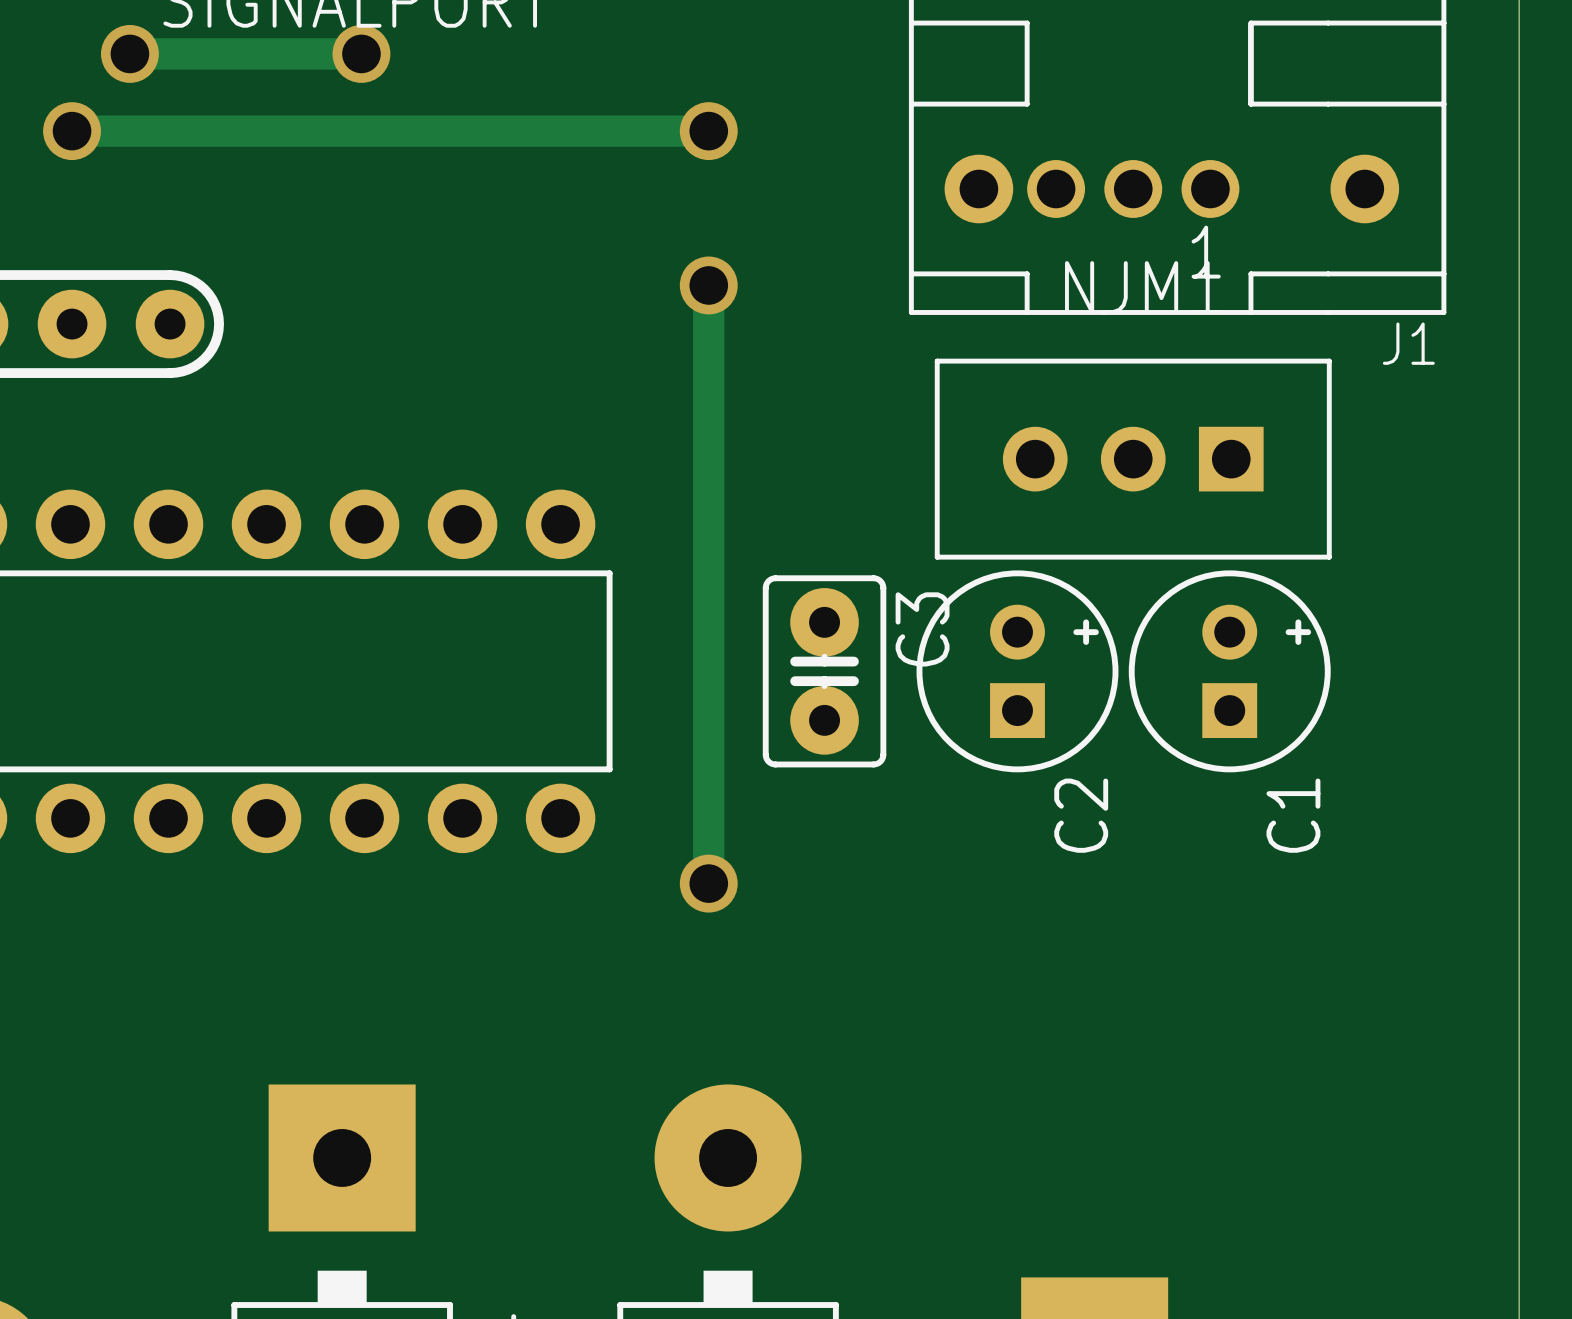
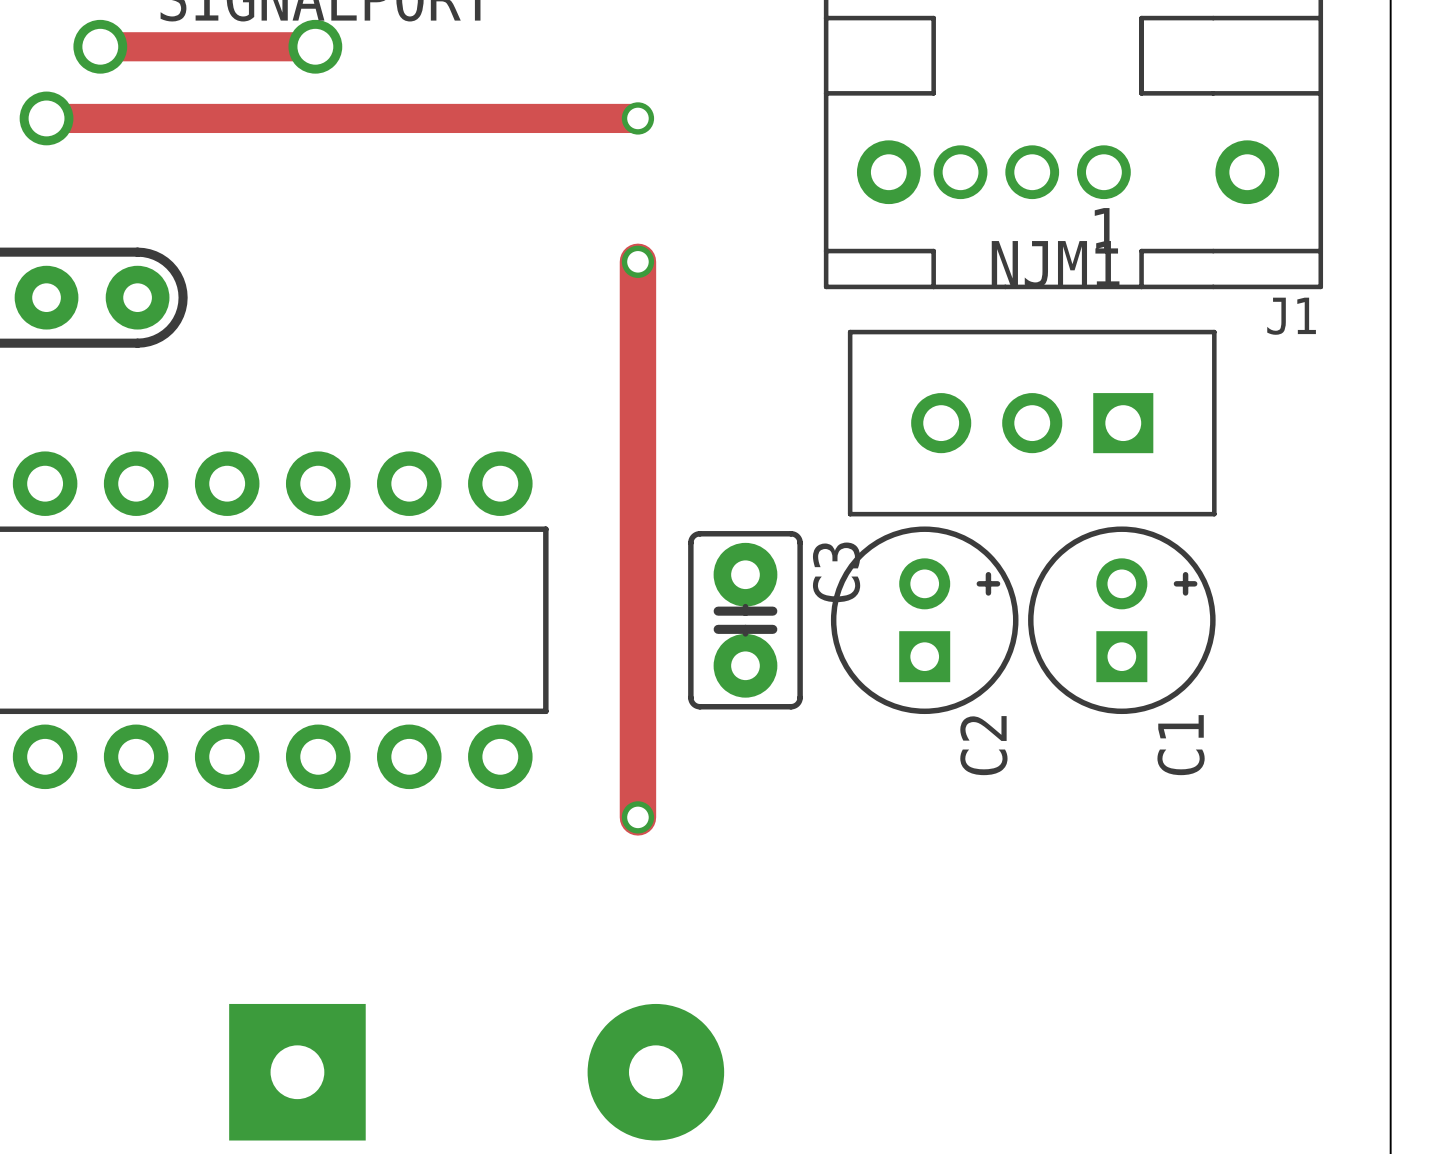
via size: [679, 102, 738, 161] -> [621, 102, 655, 135]
via size: [679, 256, 738, 315] -> [621, 245, 655, 278]
track width: thin (708, 285) (708, 883) -> thick (637, 261) (637, 817)
via size: [679, 854, 738, 913] -> [621, 801, 655, 834]

